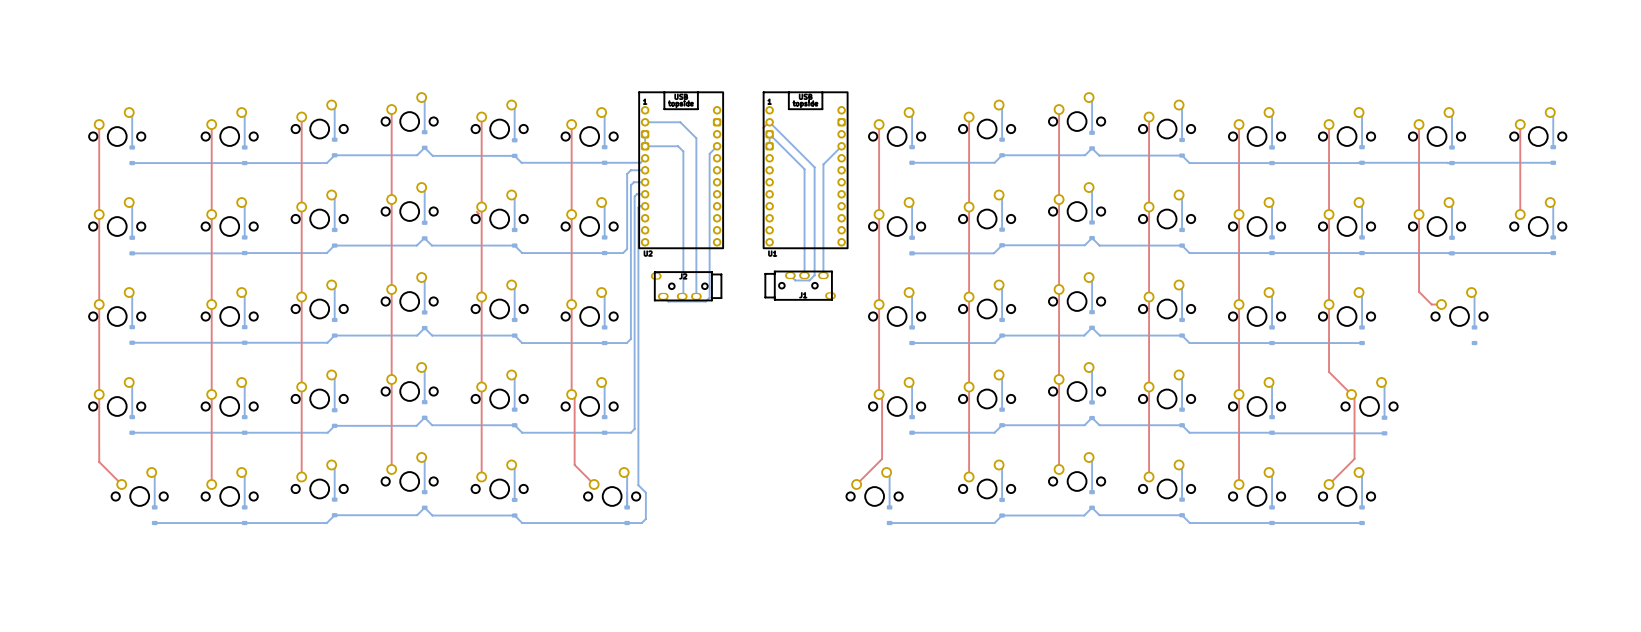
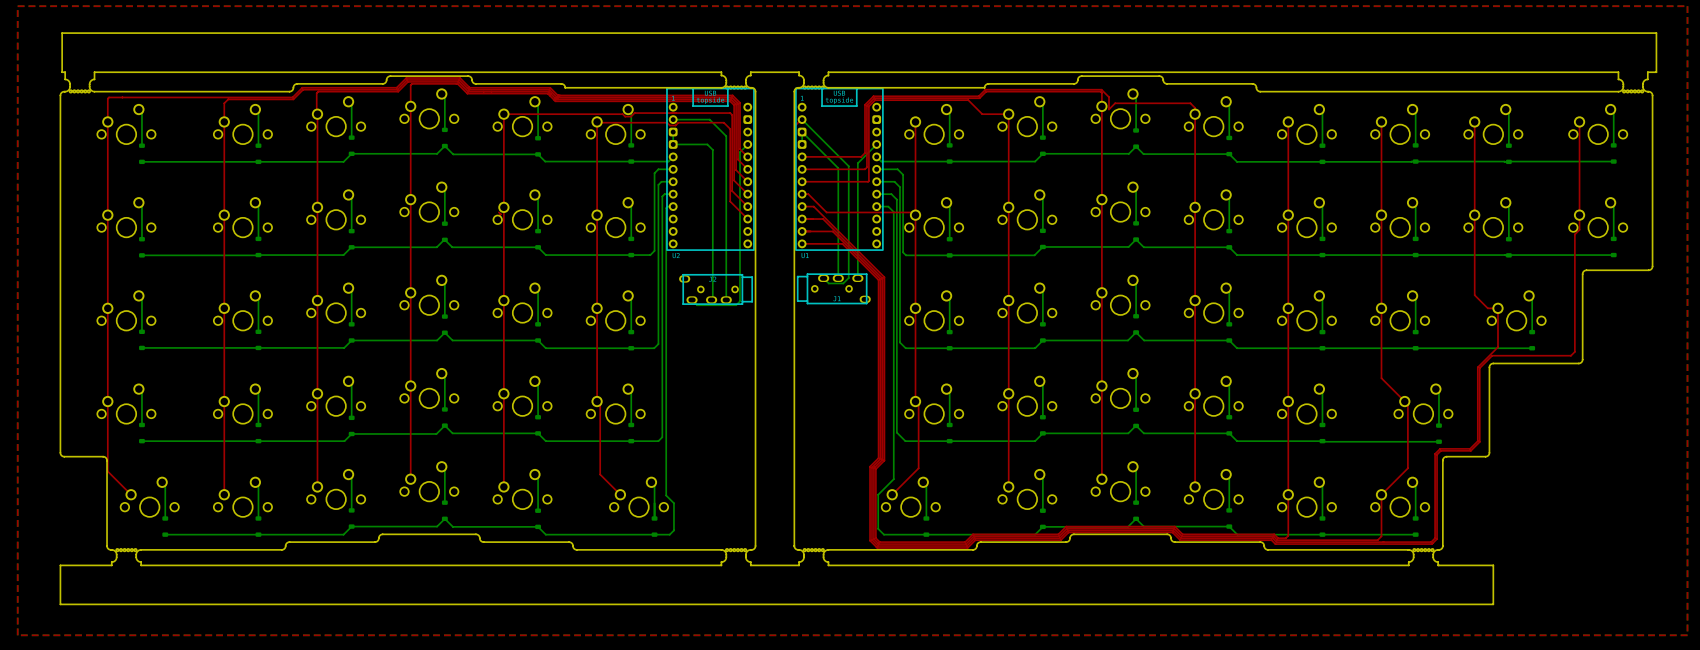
top zone outline: none -> (17, 6) (17, 635) (1687, 635) (1687, 6) (17, 6)
board edge: none -> (721, 75) (721, 72) (94, 72) (94, 79)
board edge: none -> (750, 75) (750, 72) (799, 72) (799, 75)
board edge: none -> (828, 75) (828, 72) (1618, 72) (1618, 79)
board edge: none -> (65, 79) (65, 72) (62, 72) (62, 33) (1656, 33) (1656, 72) (1647, 72) (1647, 79)
top track: none -> (458, 81) (407, 81) (398, 91) (318, 91) (317, 114)
top track: none -> (458, 81) (468, 91) (548, 91) (556, 99) (731, 99) (736, 104) (736, 170) (747, 181)
part: none -> (736, 82)
part: none -> (813, 82)
part: none -> (79, 85)
part: none -> (1633, 85)
board edge: none -> (721, 87) (565, 87) (561, 83) (475, 83) (468, 76) (390, 76) (383, 83) (296, 83) (289, 91) (94, 91)
board edge: none -> (750, 87) (755, 91) (755, 545) (750, 549)
board edge: none -> (799, 87) (794, 91) (794, 545)
board edge: none -> (828, 87) (984, 87) (988, 83) (1074, 83) (1081, 76) (1159, 76) (1166, 83) (1253, 83) (1260, 91) (1618, 91)
board edge: none -> (65, 91) (60, 95) (60, 453) (63, 456) (103, 456) (106, 458) (107, 545) (111, 549)
board edge: none -> (1647, 91) (1652, 95) (1652, 267) (1648, 270) (1583, 271) (1582, 359) (1580, 362) (1490, 364) (1489, 453) (1486, 456) (1446, 456) (1443, 458) (1442, 545) (1438, 549)
top track: none -> (410, 106) (411, 83) (457, 83) (467, 93) (547, 93) (555, 101) (730, 101) (734, 105) (734, 180) (747, 194)
top track: none -> (1098, 106) (1101, 106) (1100, 91) (986, 91) (979, 98) (874, 98) (866, 105) (866, 167) (865, 169) (802, 169)
top track: none -> (503, 114) (622, 114) (625, 116) (631, 116) (634, 113) (730, 113) (732, 114) (732, 191) (747, 206)
top track: none -> (1008, 114) (982, 114) (968, 100) (875, 100) (868, 106) (868, 180) (802, 181)
top track: none -> (1195, 114) (1195, 107) (1190, 103) (1115, 103) (1109, 109) (1109, 97) (1101, 89) (985, 89) (978, 96) (873, 96) (865, 104) (865, 153) (861, 156) (802, 156)
top track: none -> (107, 121) (108, 97) (292, 97) (302, 87) (396, 87) (406, 78) (460, 78) (469, 87) (550, 87) (557, 95) (732, 95) (739, 102) (739, 149) (747, 156)
top track: none -> (224, 121) (224, 103) (228, 99) (293, 99) (303, 89) (397, 89) (407, 79) (459, 79) (469, 89) (549, 89) (557, 97) (731, 97) (738, 103) (738, 159) (747, 169)
top track: none -> (597, 121) (667, 122) (669, 125) (675, 125) (678, 122) (723, 122) (730, 129) (730, 201) (747, 219)
bottom track: none -> (876, 156) (881, 161) (949, 161)
bottom track: none -> (876, 169) (897, 169) (903, 174) (903, 252) (906, 255) (949, 255)
bottom track: none -> (876, 181) (894, 181) (899, 187) (899, 342) (905, 348) (949, 348)
top track: none -> (802, 194) (808, 194) (826, 212) (912, 212) (915, 215)
bottom track: none -> (876, 194) (891, 194) (896, 199) (896, 432) (905, 441) (949, 441)
top track: none -> (802, 206) (813, 206) (884, 277) (884, 460) (875, 469) (875, 538) (879, 542) (965, 542) (972, 534) (1058, 534) (1066, 526) (1174, 526) (1182, 534) (1274, 534) (1278, 538) (1285, 538) (1288, 535) (1288, 494)
bottom track: none -> (876, 206) (888, 206) (893, 212) (893, 479) (878, 494) (878, 528) (883, 534) (926, 534)
top track: none -> (1579, 215) (1579, 229) (1574, 234) (1574, 351) (1571, 355) (1492, 355) (1479, 368) (1479, 441) (1470, 450) (1440, 450) (1437, 454) (1437, 539) (1432, 544) (1275, 544) (1271, 540) (1180, 540) (1172, 532) (1068, 532) (1060, 540) (975, 540) (967, 547) (877, 547) (870, 540) (870, 466) (878, 458) (878, 280) (842, 243) (802, 243) (803, 245)
top track: none -> (802, 219) (823, 219) (882, 278) (882, 459) (873, 468) (873, 539) (878, 544) (966, 544) (973, 536) (1059, 536) (1066, 528) (1174, 528) (1181, 536) (1273, 536) (1277, 540) (1377, 540) (1381, 536) (1381, 494)
top track: none -> (802, 231) (832, 231) (880, 279) (880, 458) (871, 467) (871, 539) (878, 546) (966, 546) (974, 538) (1060, 538) (1067, 530) (1173, 530) (1181, 538) (1272, 538) (1276, 542) (1431, 542) (1435, 538) (1435, 453) (1440, 448) (1470, 448) (1477, 441) (1477, 367) (1497, 347) (1497, 308)
bottom track: none -> (1415, 348) (1532, 348)
board edge: none -> (794, 545) (799, 549)
board edge: none -> (141, 549) (281, 549) (289, 542) (375, 542) (382, 534) (476, 534) (483, 542) (569, 542) (576, 549) (721, 549)
board edge: none -> (828, 549) (972, 549) (980, 542) (1066, 542) (1073, 534) (1167, 534) (1174, 542) (1260, 542) (1268, 549) (1408, 549)
part: none -> (126, 555)
part: none -> (736, 555)
part: none -> (813, 555)
part: none -> (1423, 555)
board edge: none -> (111, 562) (111, 565) (60, 565) (60, 604) (1493, 604)
board edge: none -> (141, 562) (141, 565) (721, 565) (721, 562)
board edge: none -> (750, 562) (750, 565) (799, 565) (799, 562)
board edge: none -> (828, 562) (828, 565) (1408, 565) (1408, 562)
board edge: none -> (1438, 562) (1438, 565) (1493, 565)
board edge: none -> (1493, 565) (1493, 604)

